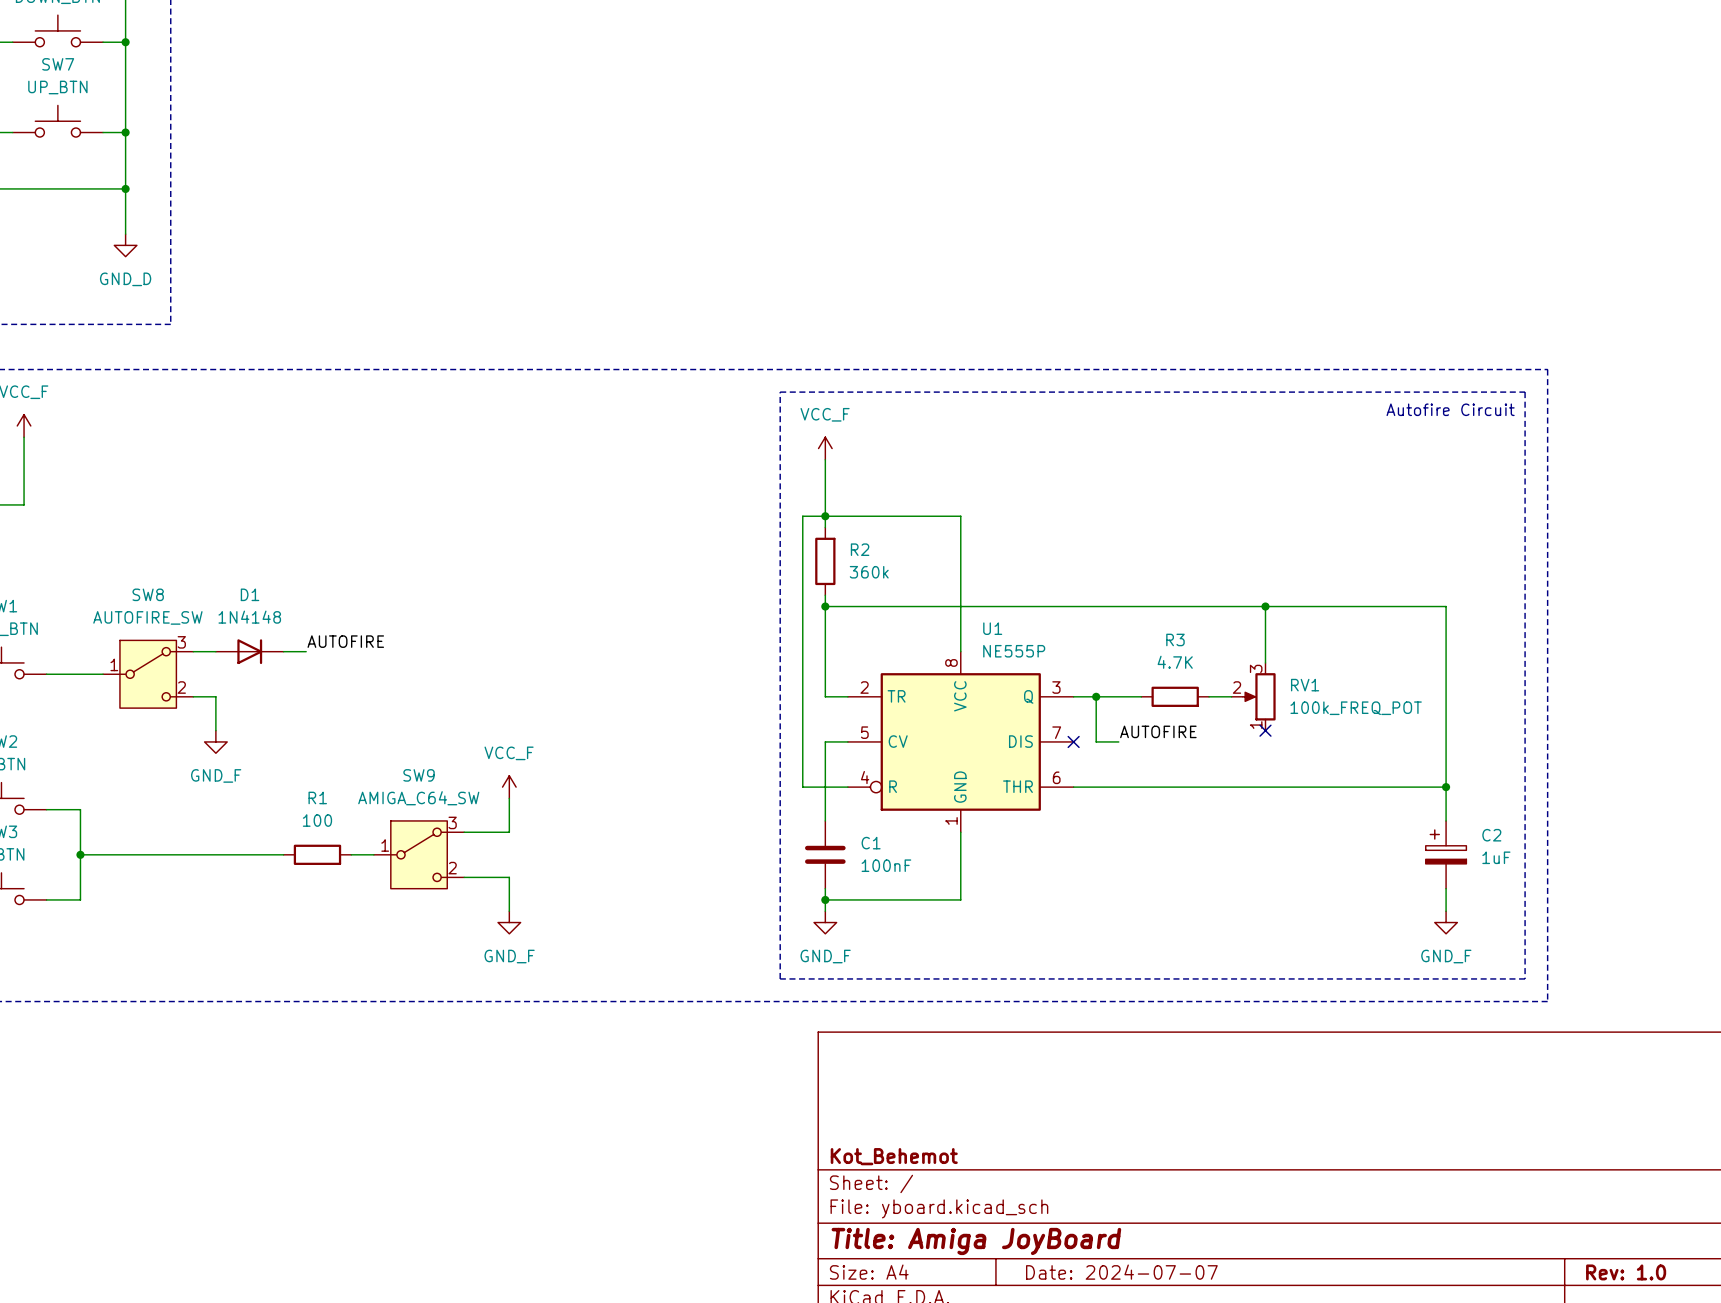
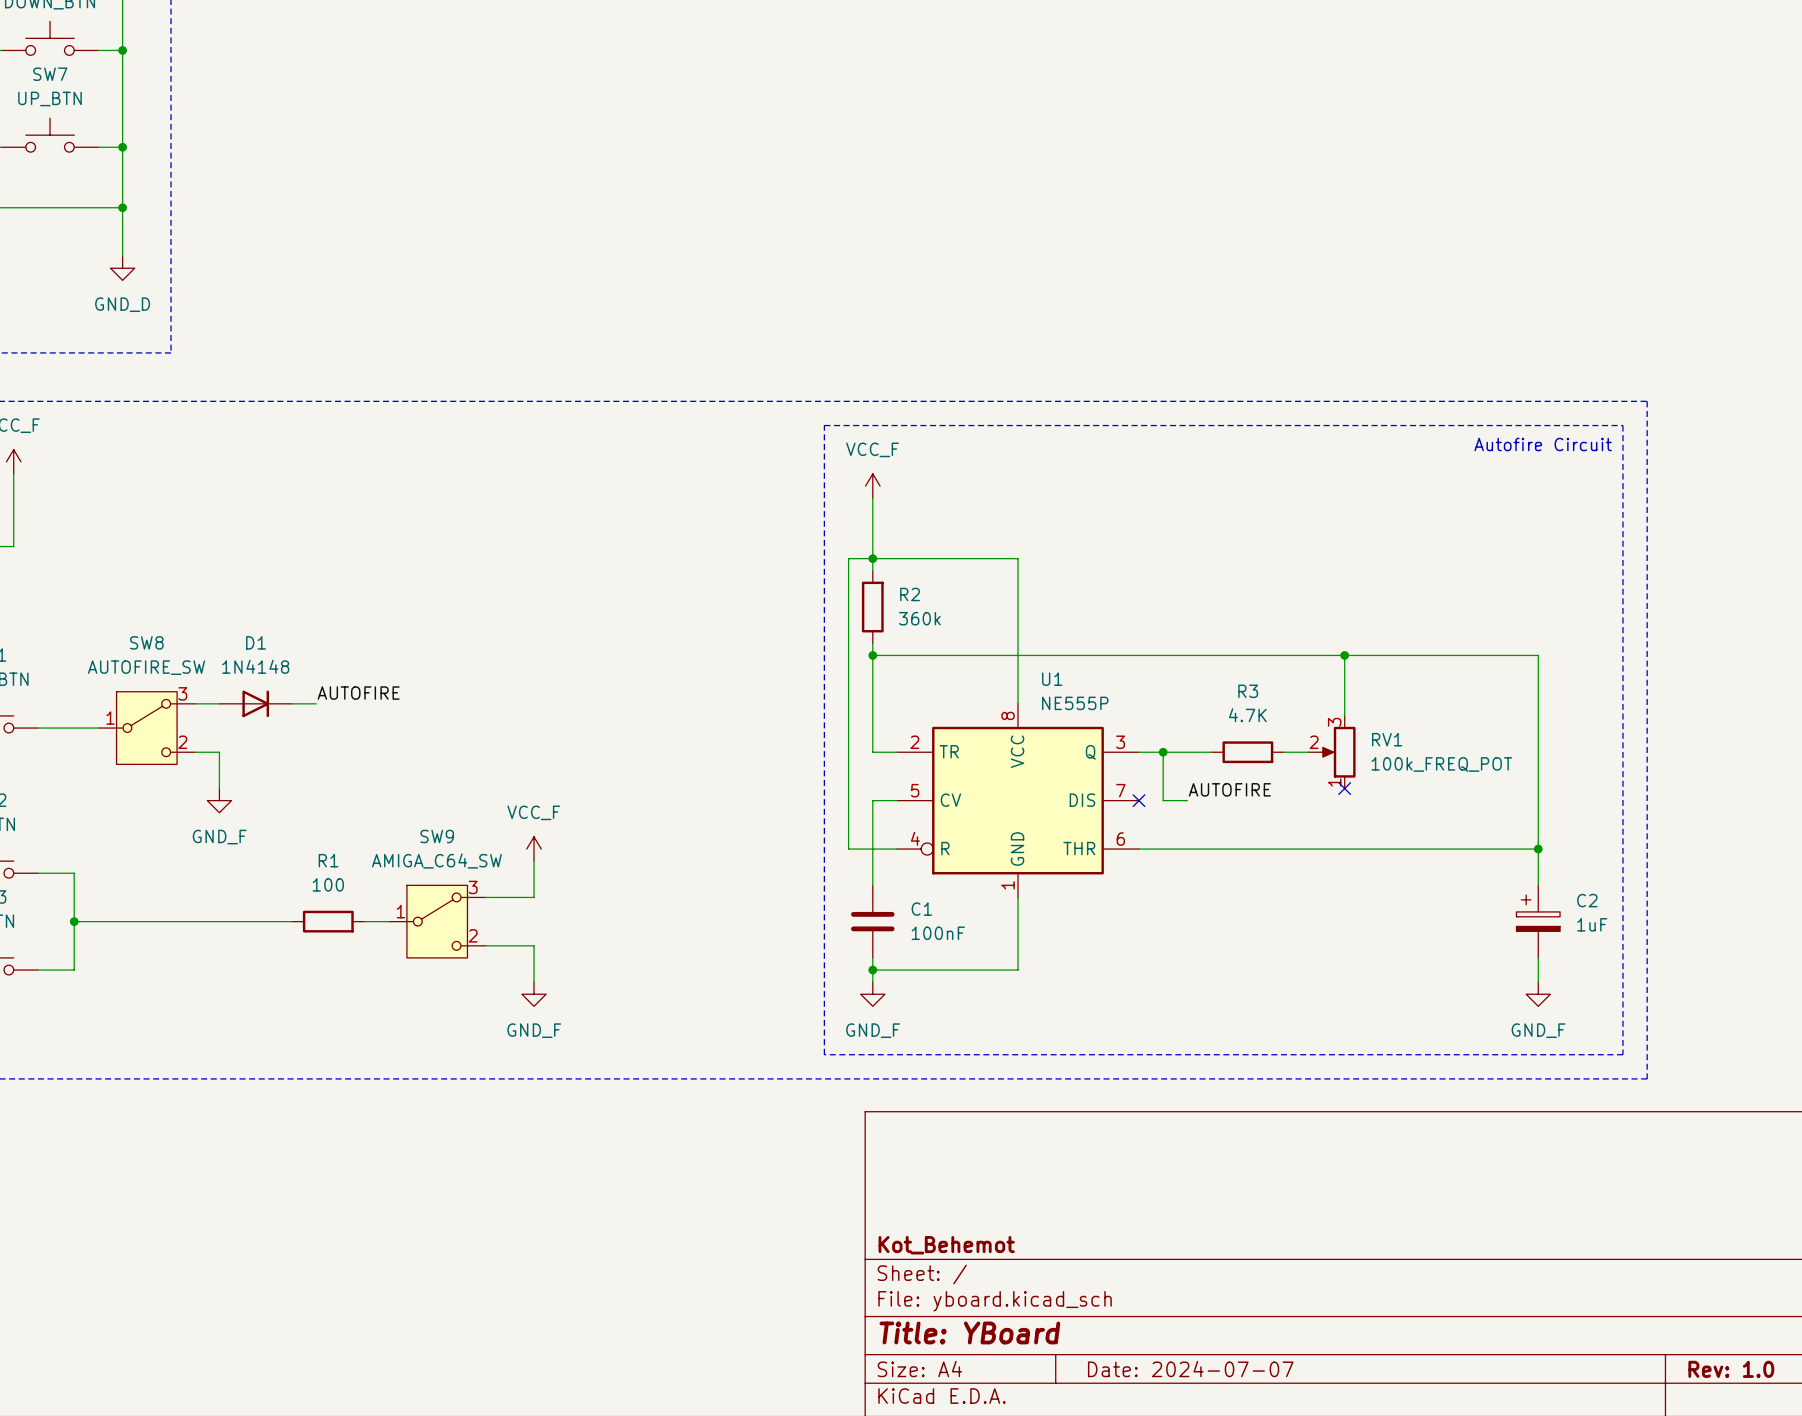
title block: Title: Amiga JoyBoard (976, 1241) -> Title: YBoard (969, 1332)

